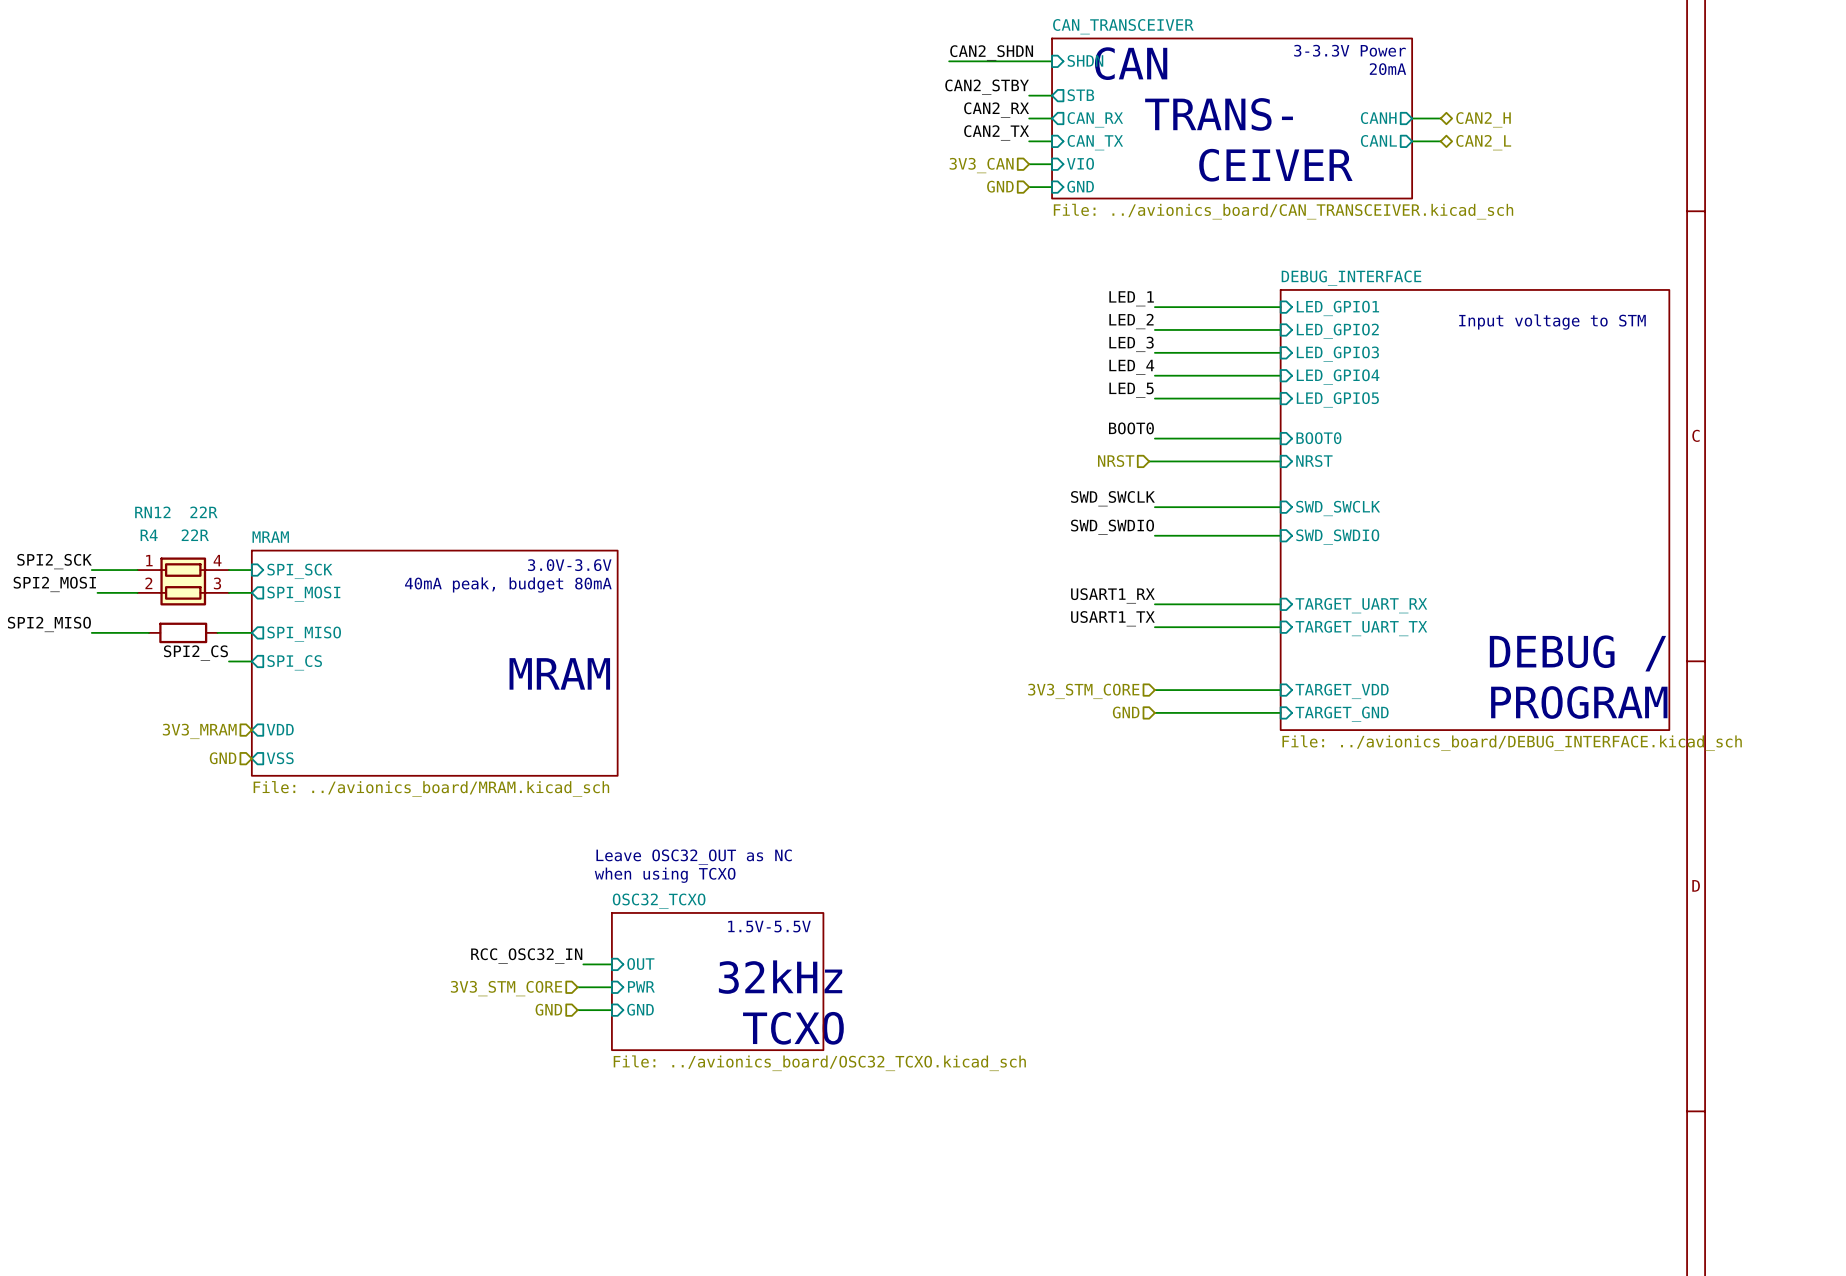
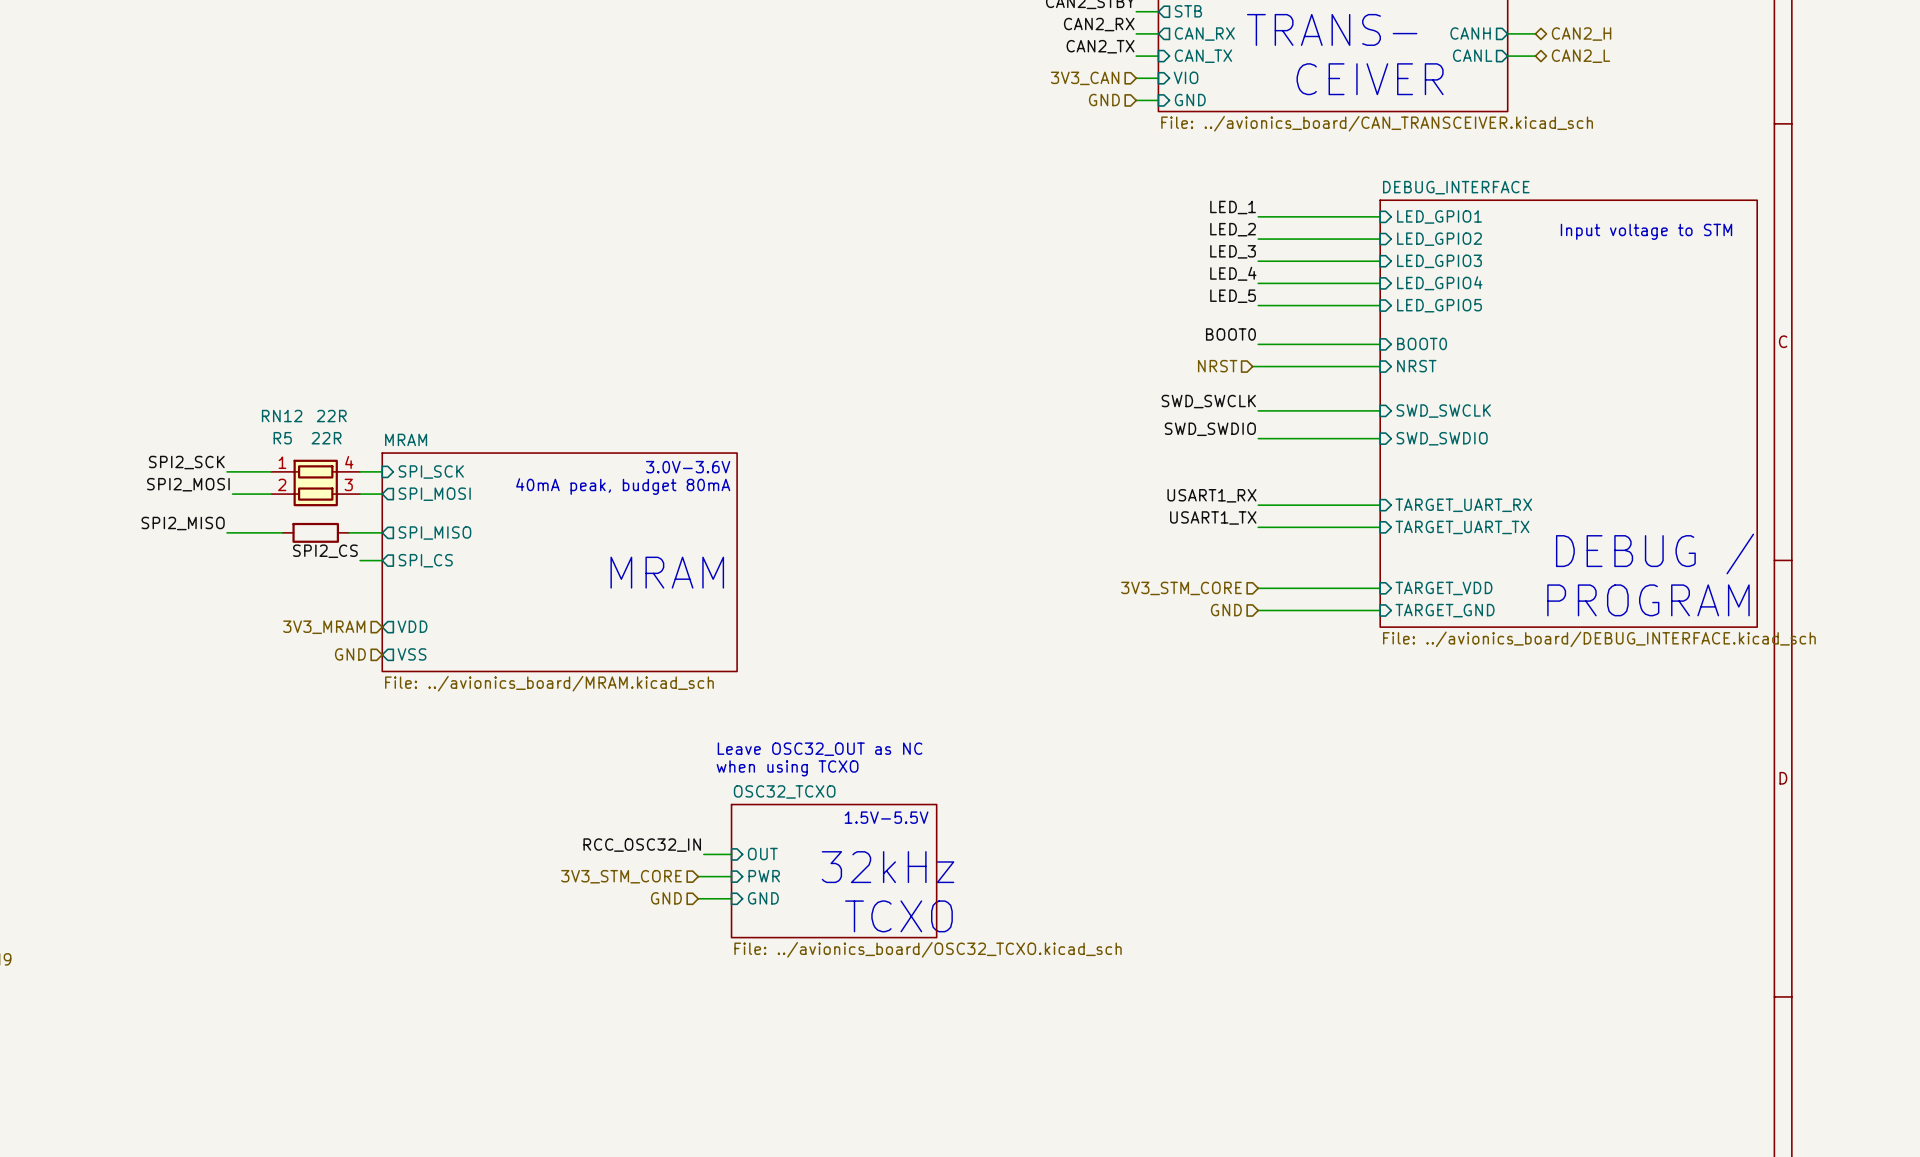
R4 name: R4 (149, 535) -> R5 (282, 438)

